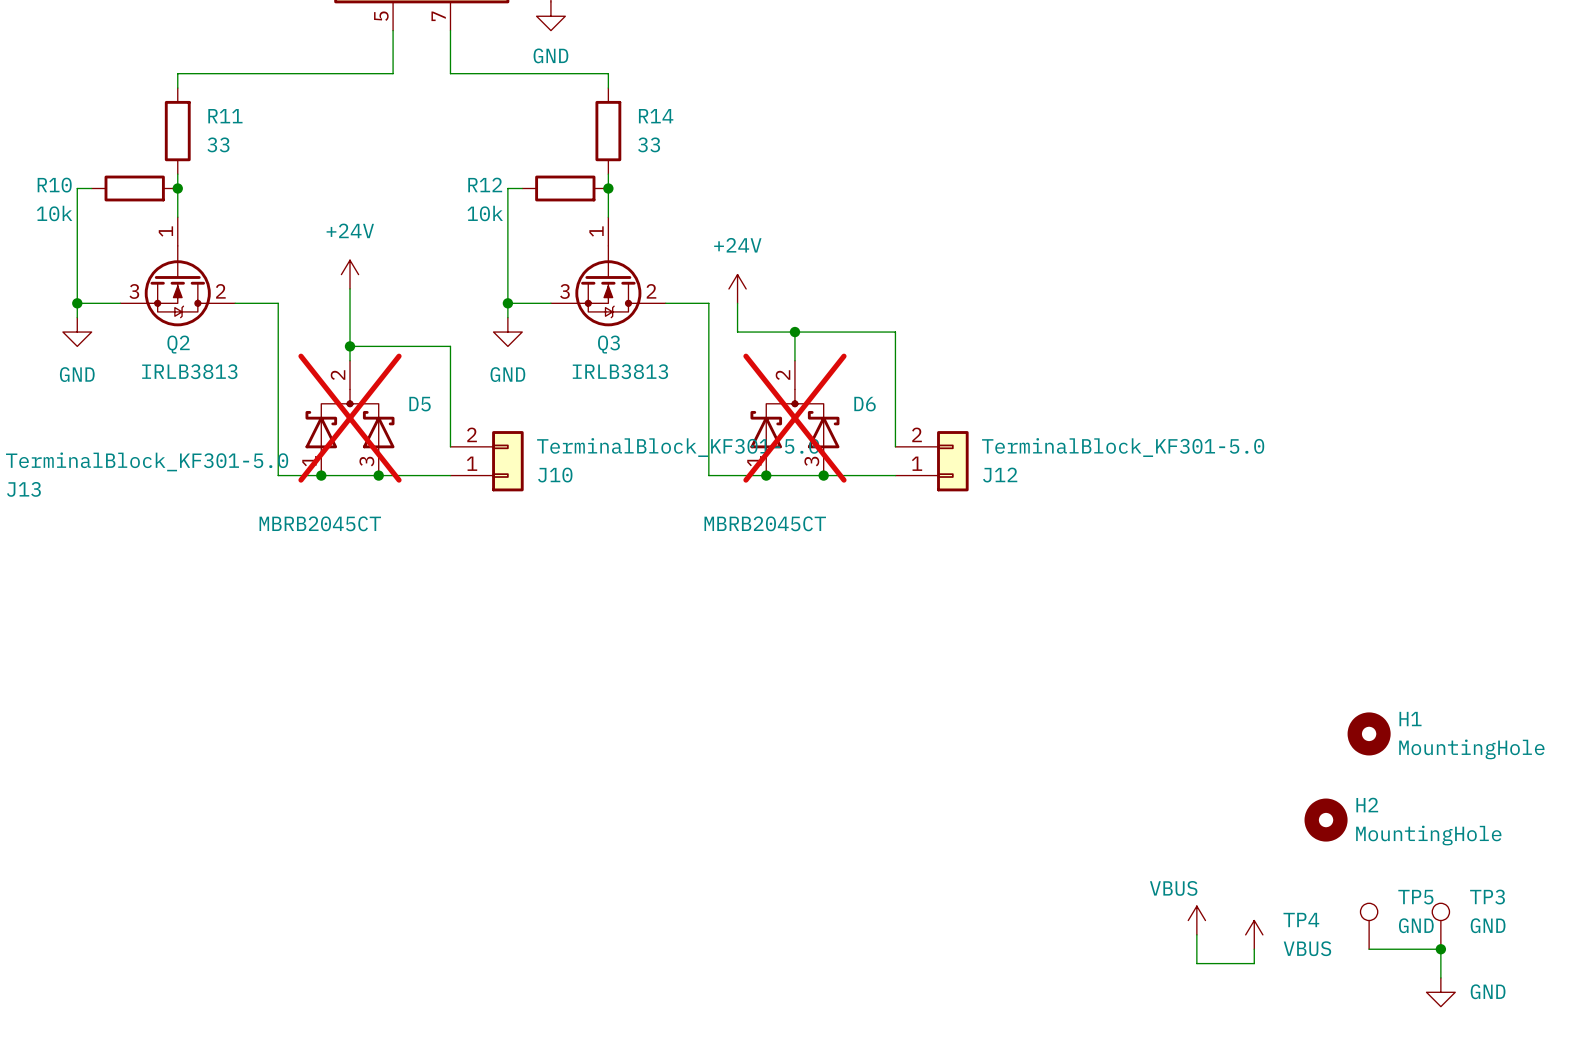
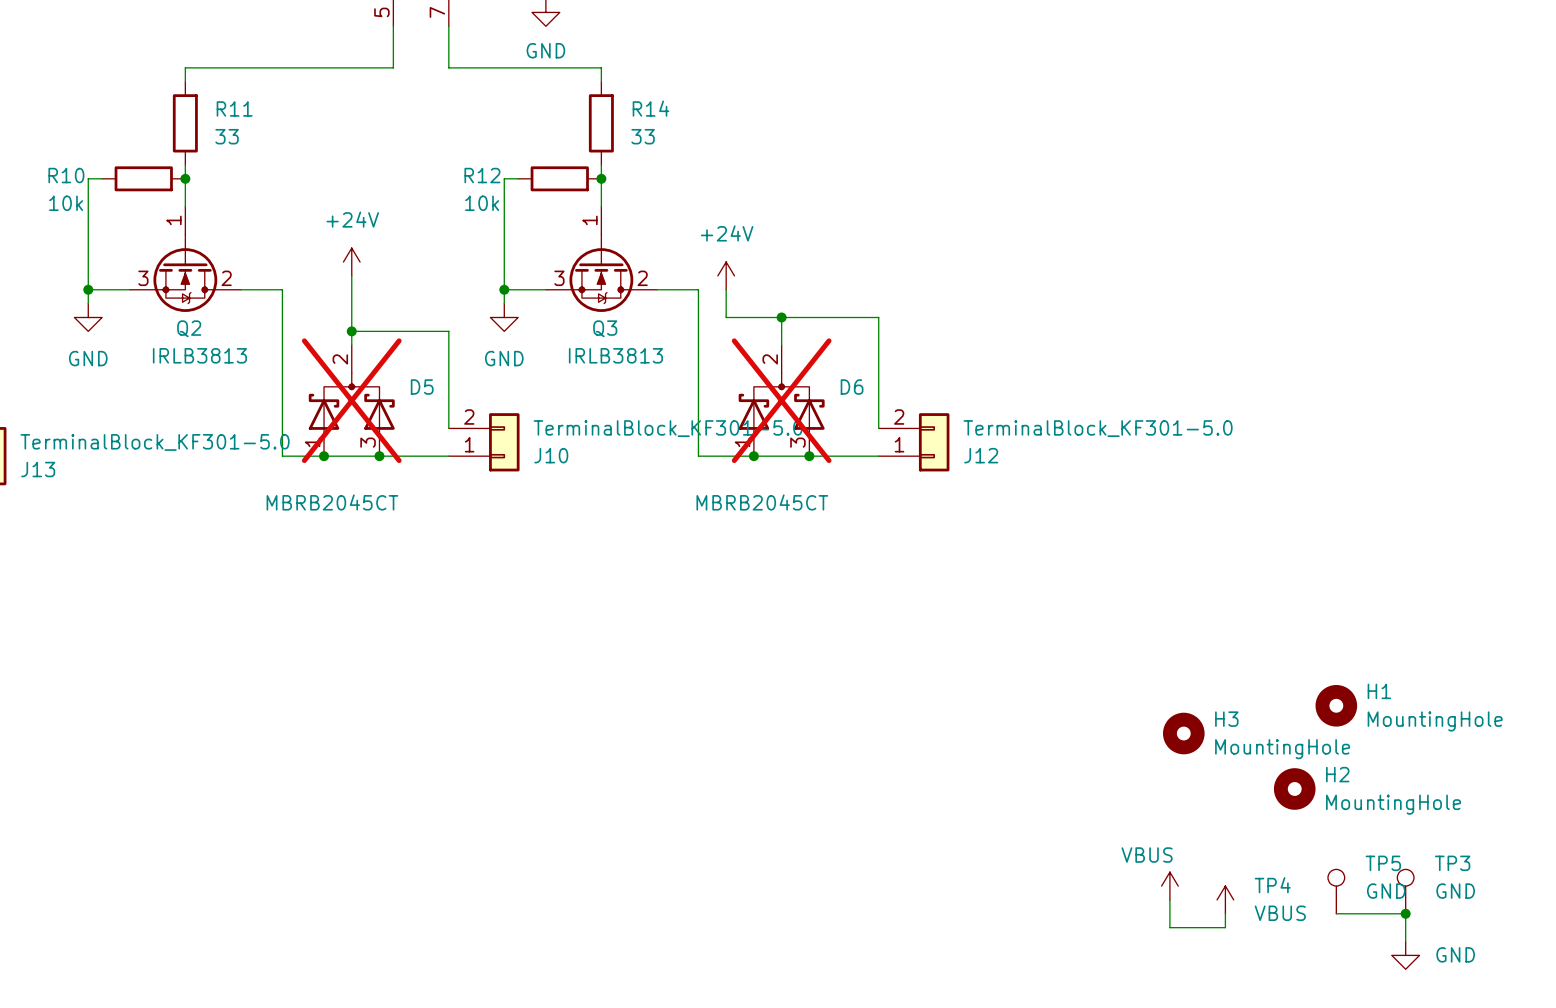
H3: none -> MountingHole (1183, 733)

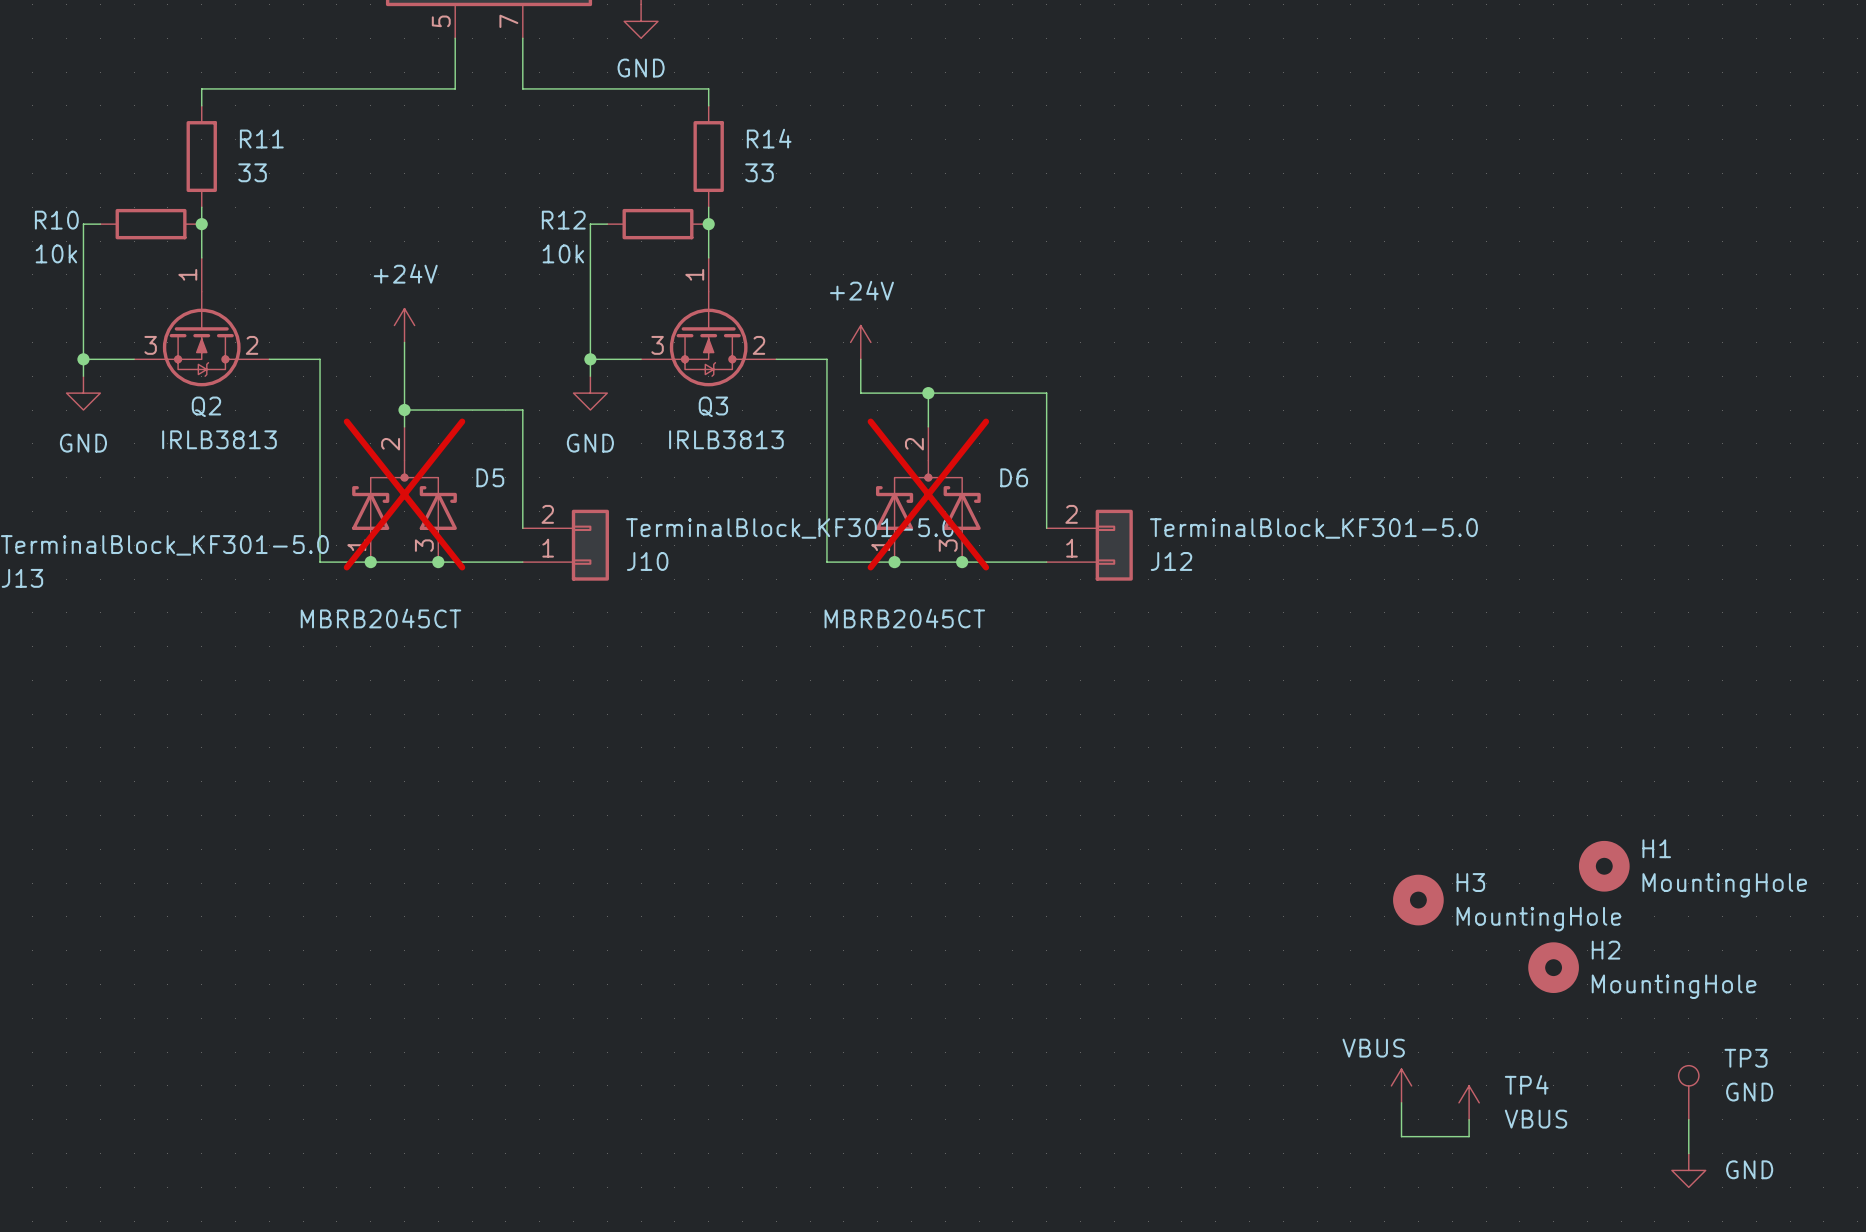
TP5: GND (1336, 891) -> none
wire: (1336, 913) (1405, 913) -> none
junction: (1405, 913) -> none

